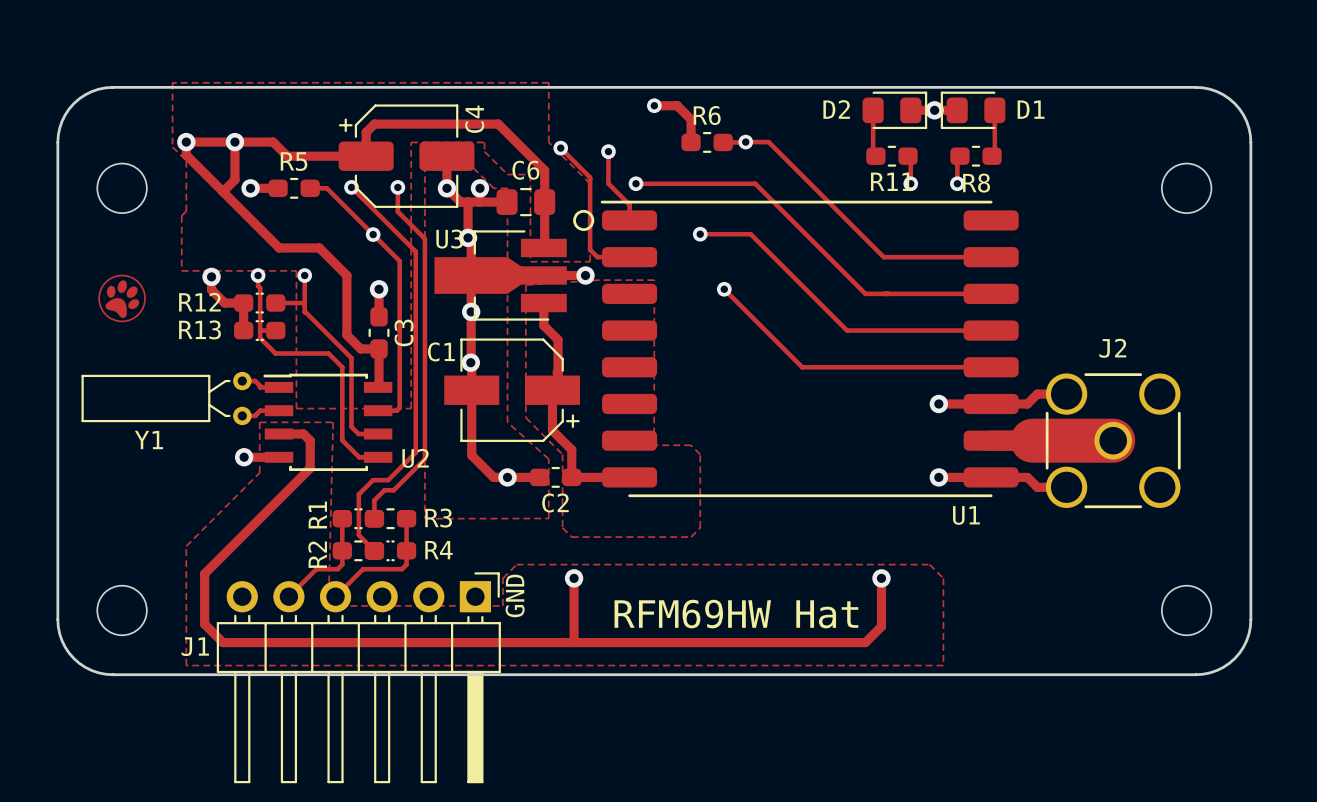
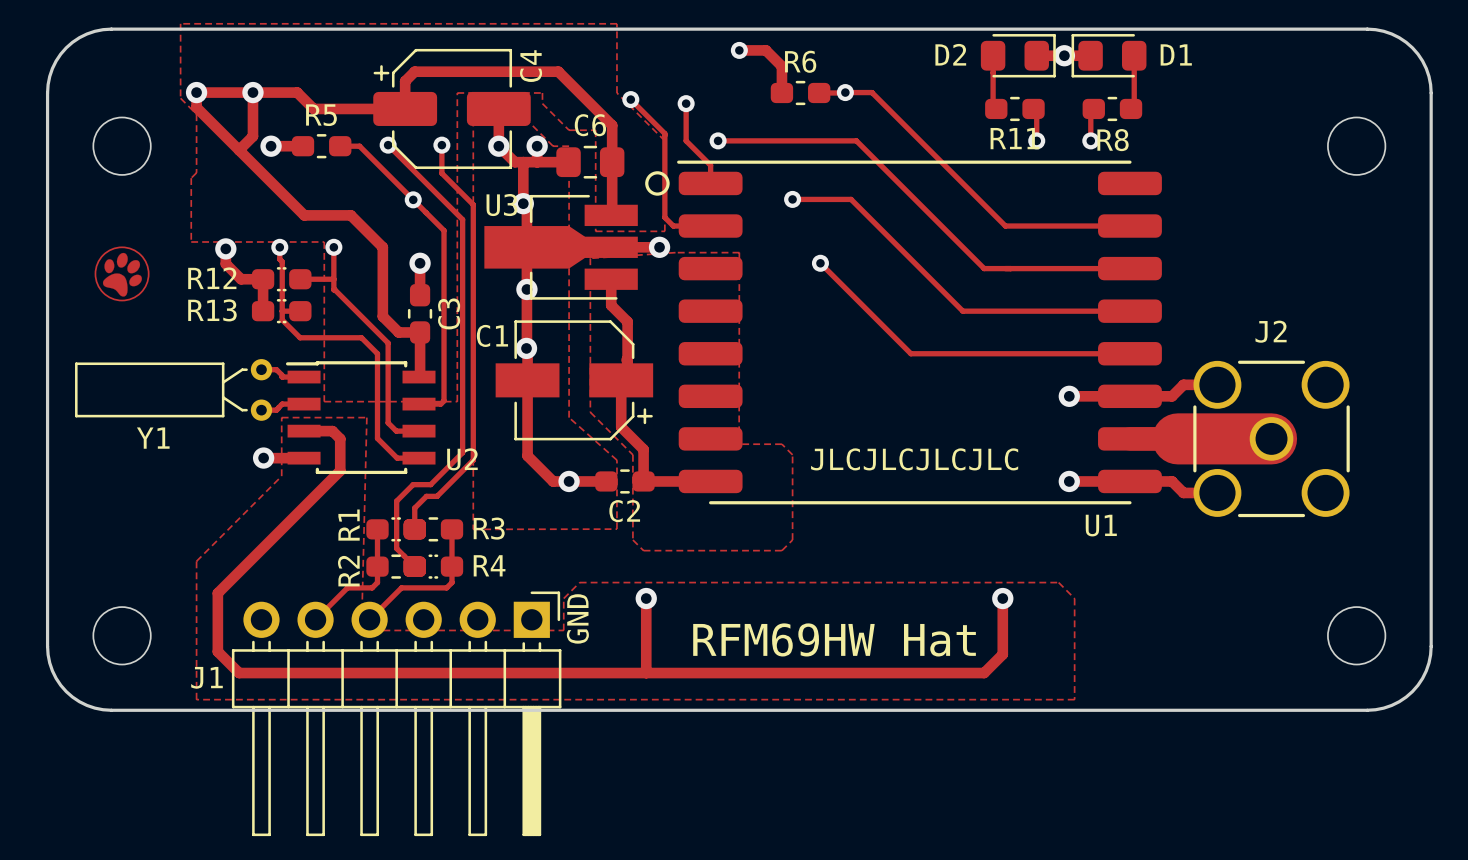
text: none -> JLCJLCJLCJLC (914, 459)

